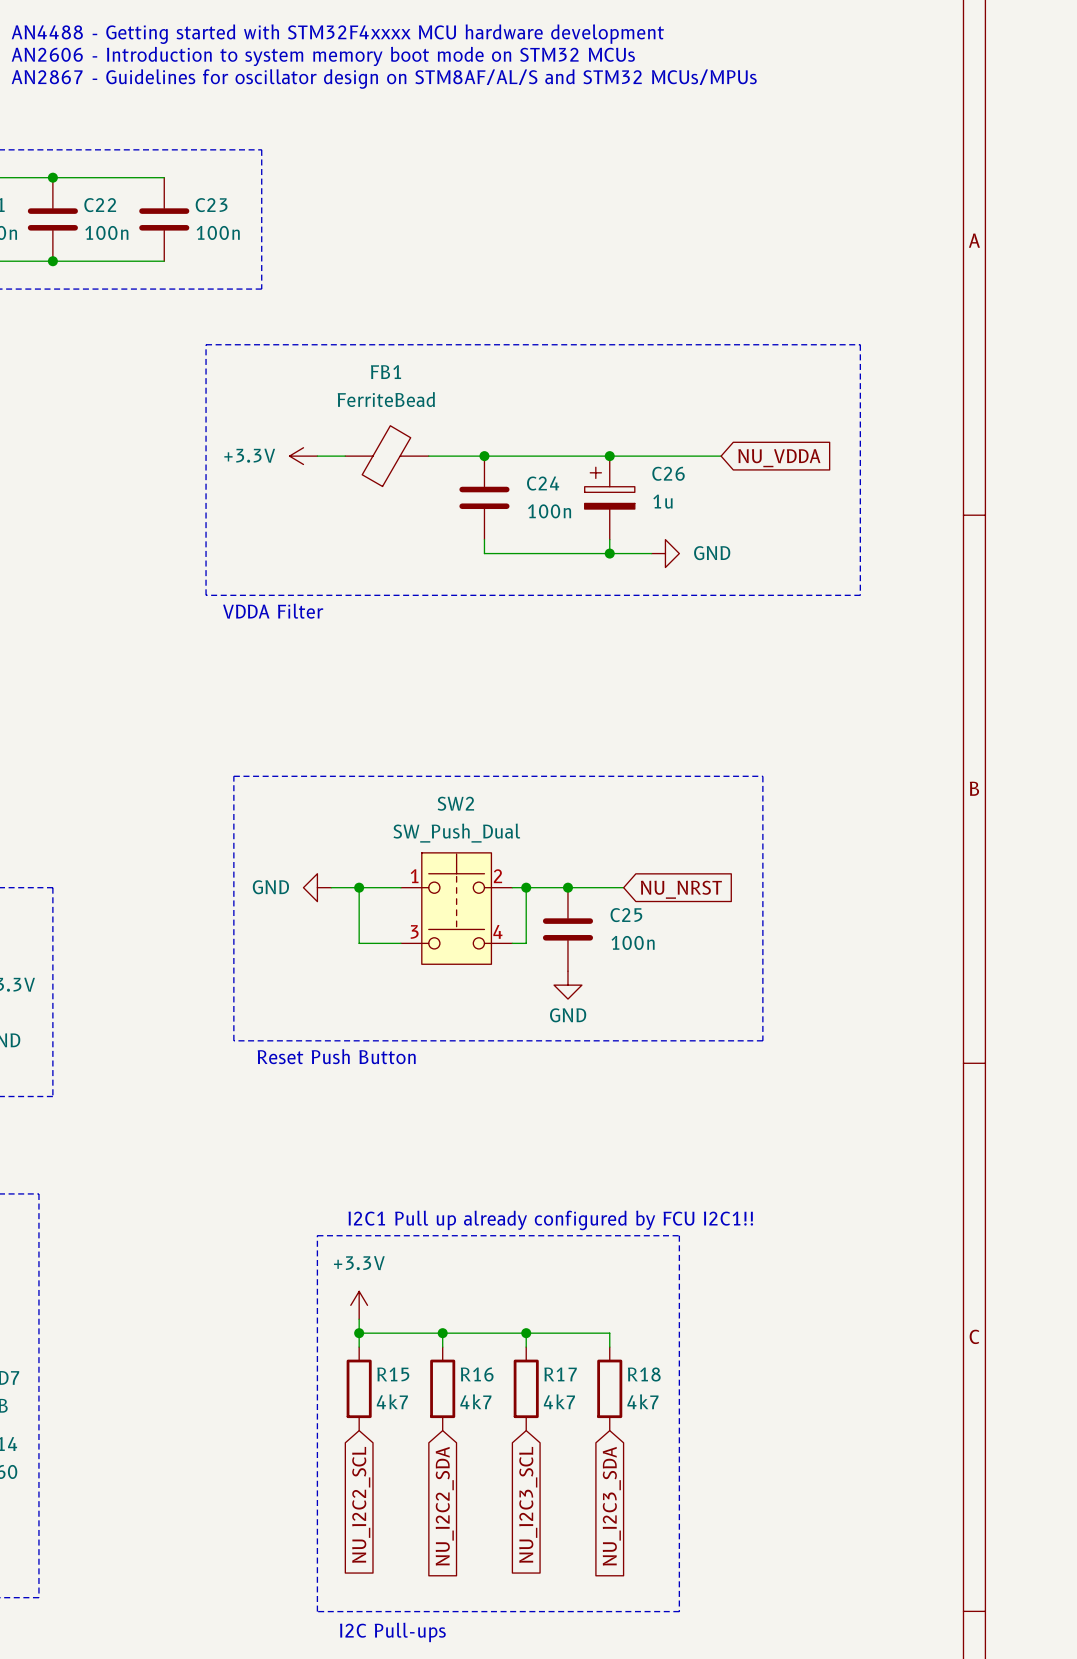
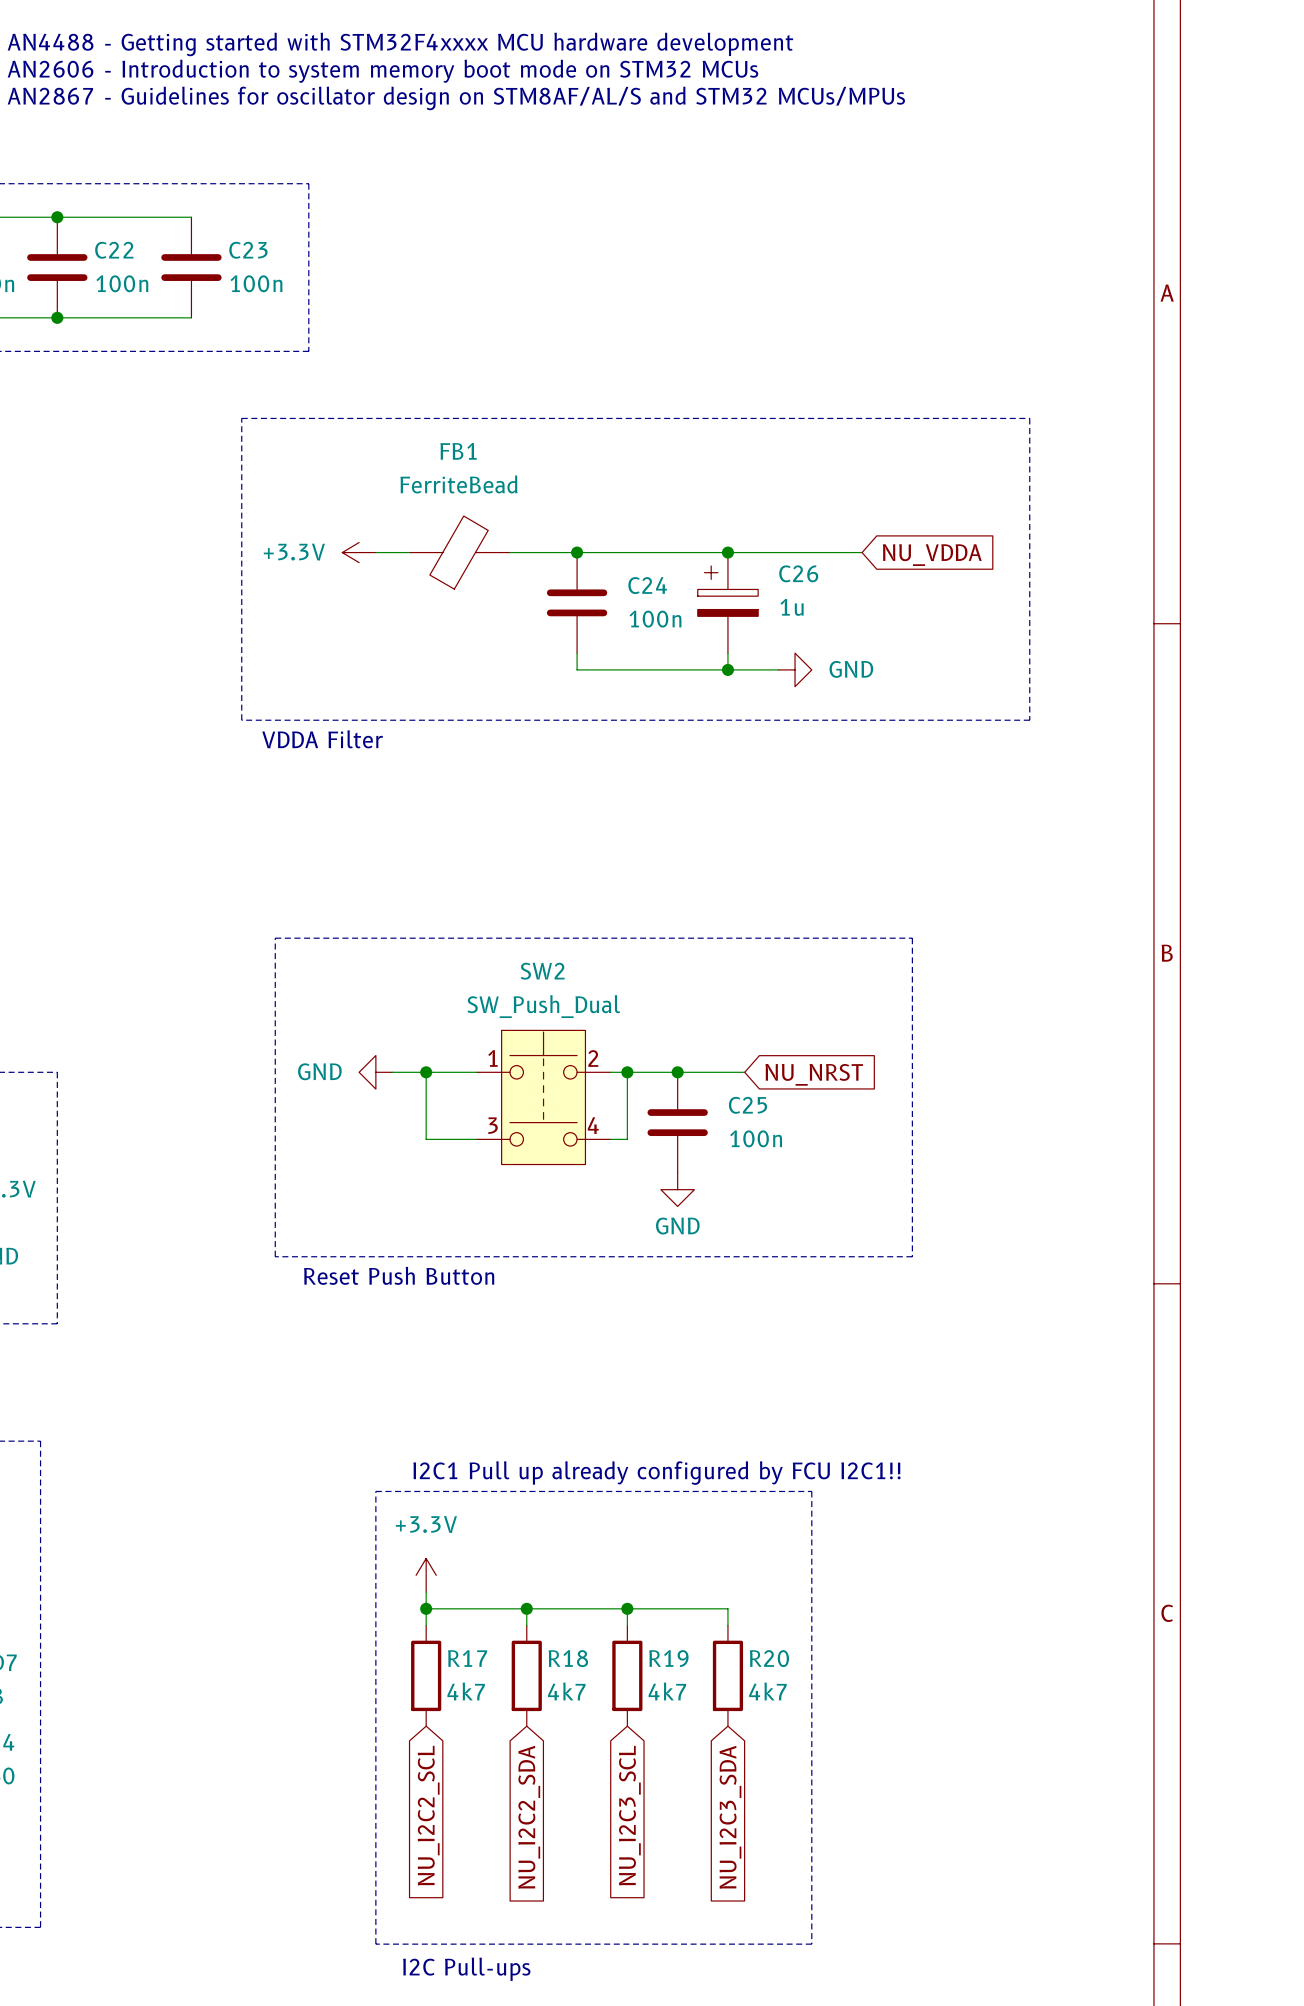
R15 name: R15 (393, 1374) -> R17 (467, 1658)
R16 name: R16 (477, 1374) -> R18 (568, 1658)
R17 name: R17 (560, 1374) -> R19 (668, 1658)
R18 name: R18 (644, 1374) -> R20 (769, 1658)

